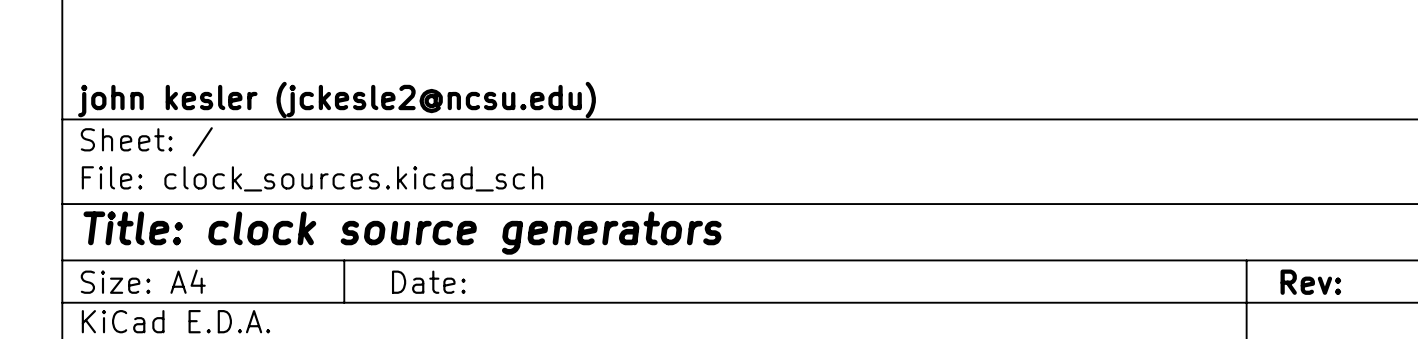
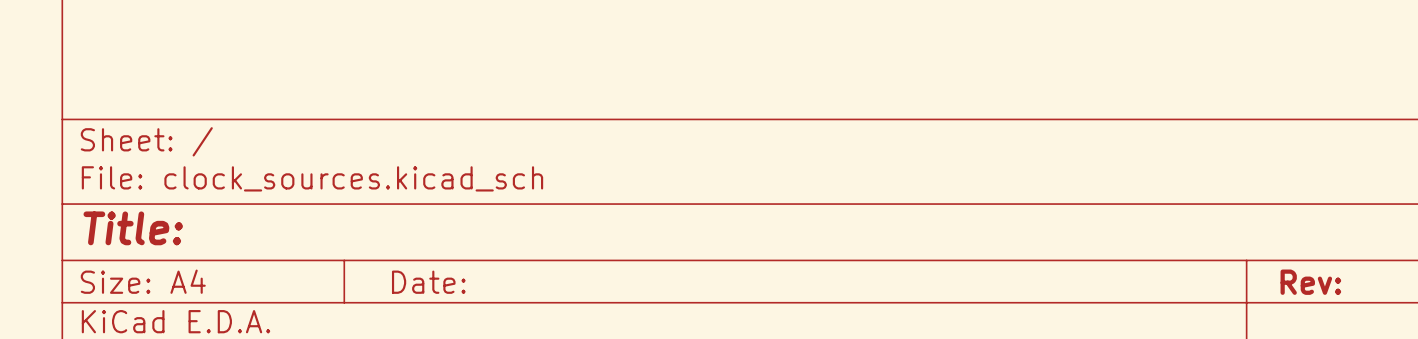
title block: john kesler (jckesle2@ncsu.edu) (337, 100) -> none
title block: Title: clock source generators (402, 233) -> Title: (133, 228)

